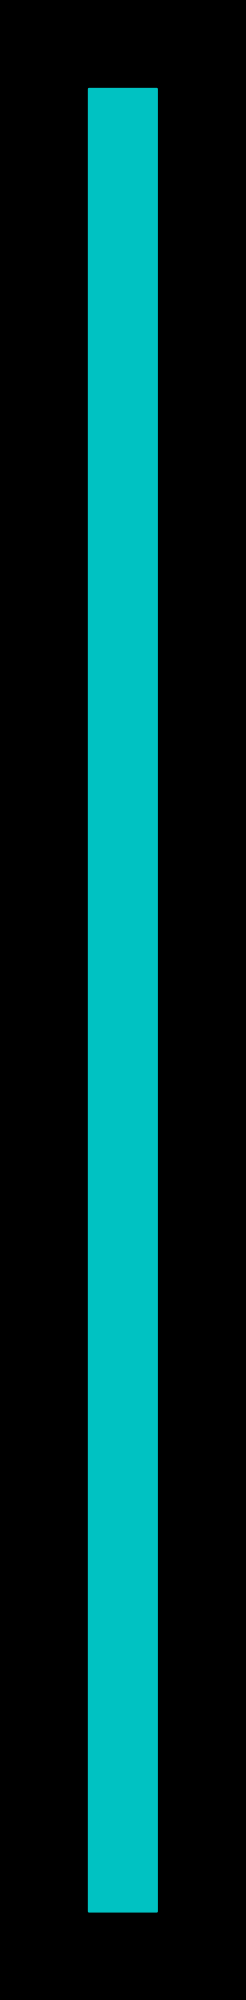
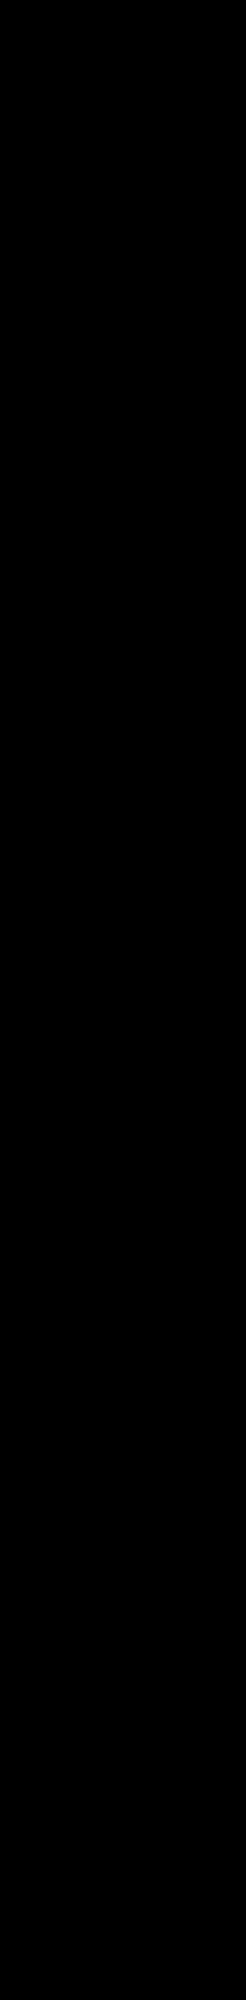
drawing: [87, 87, 158, 1913] -> none

